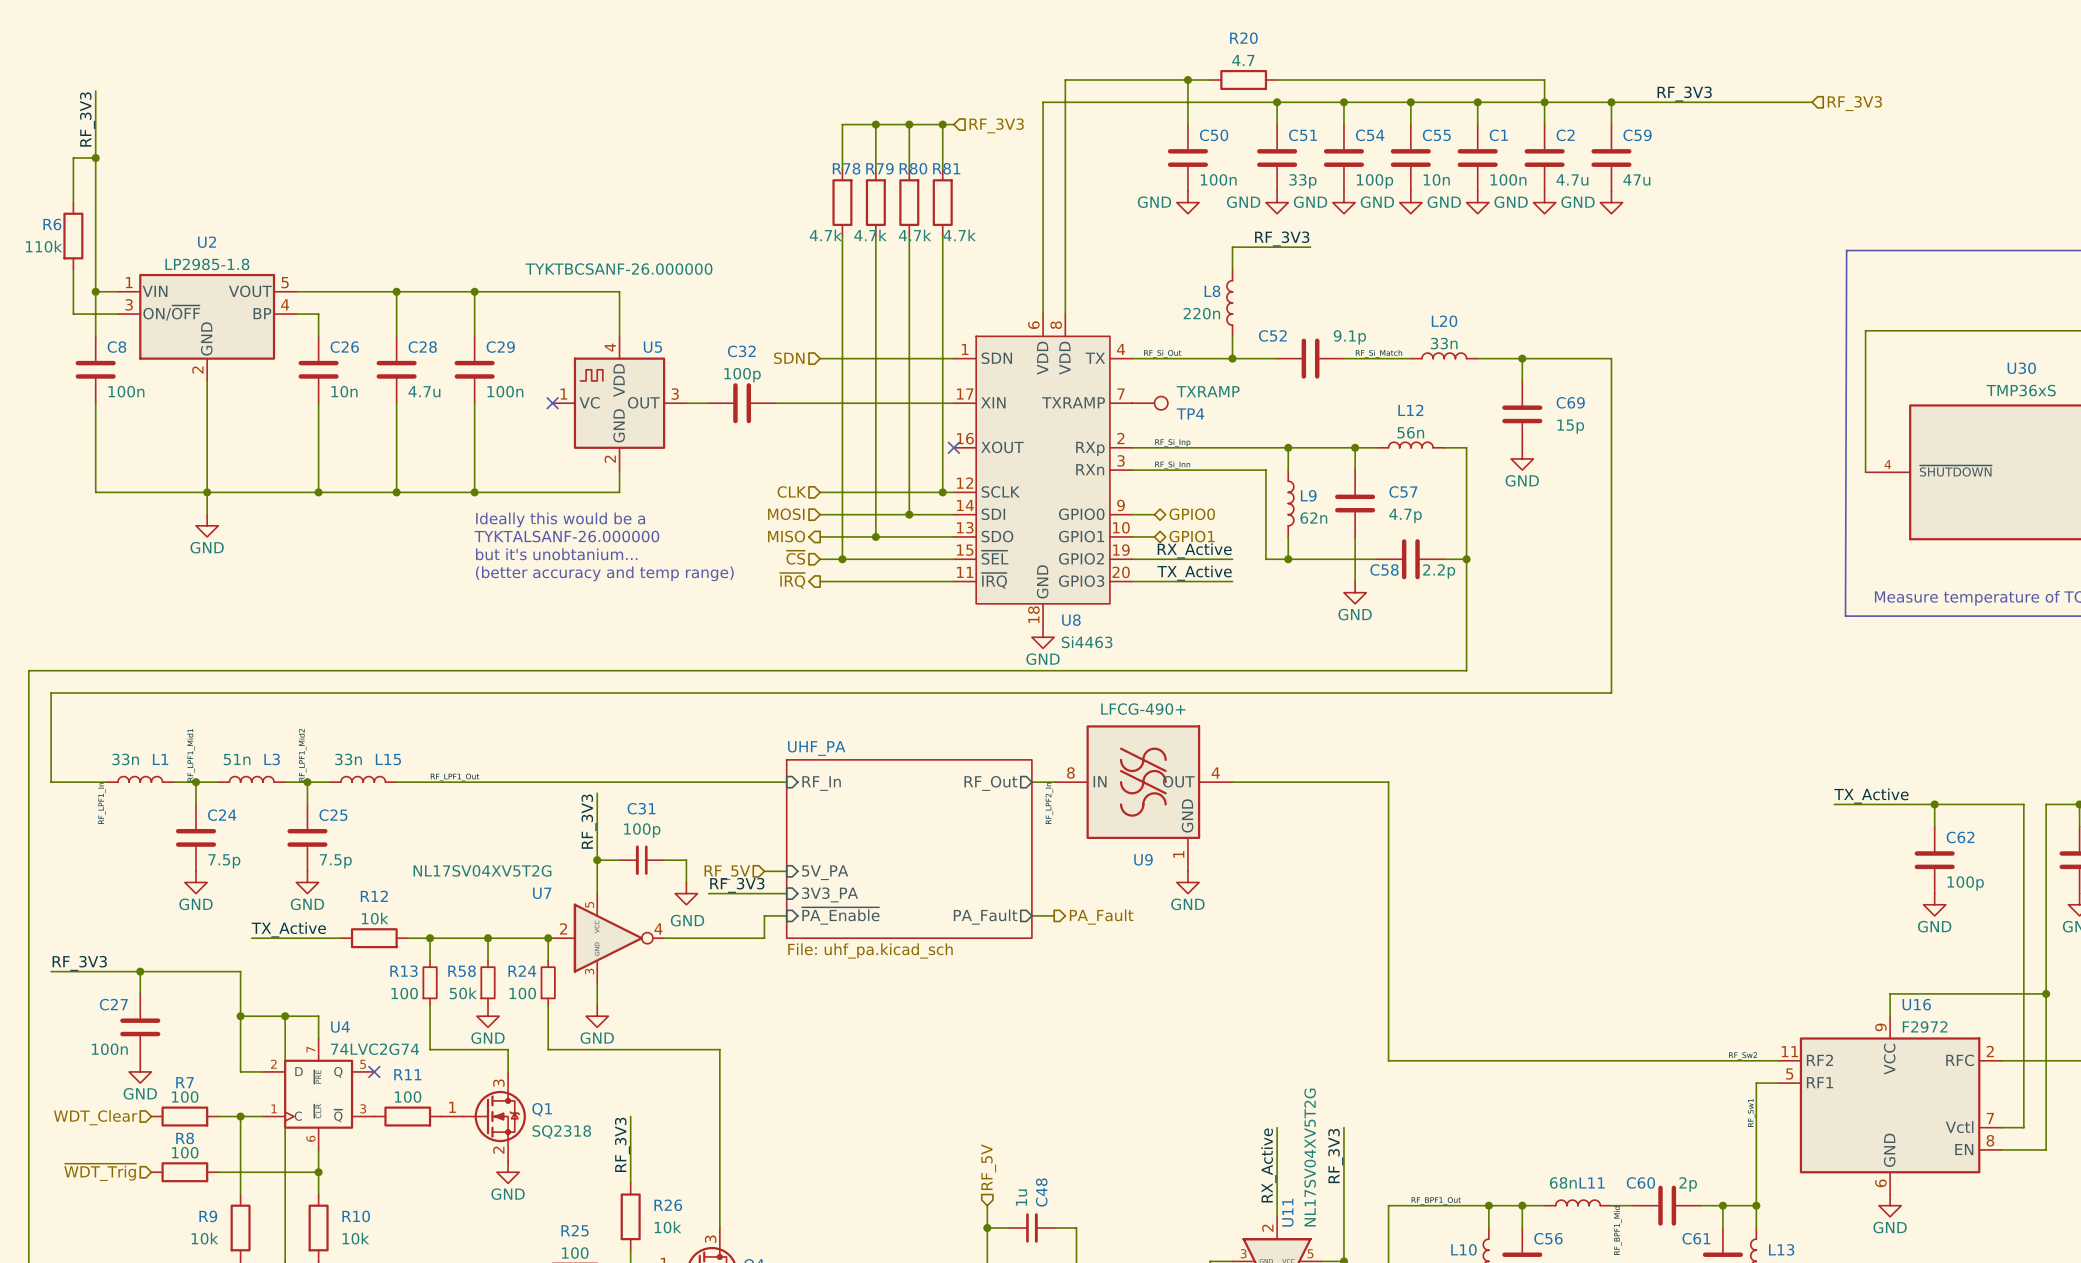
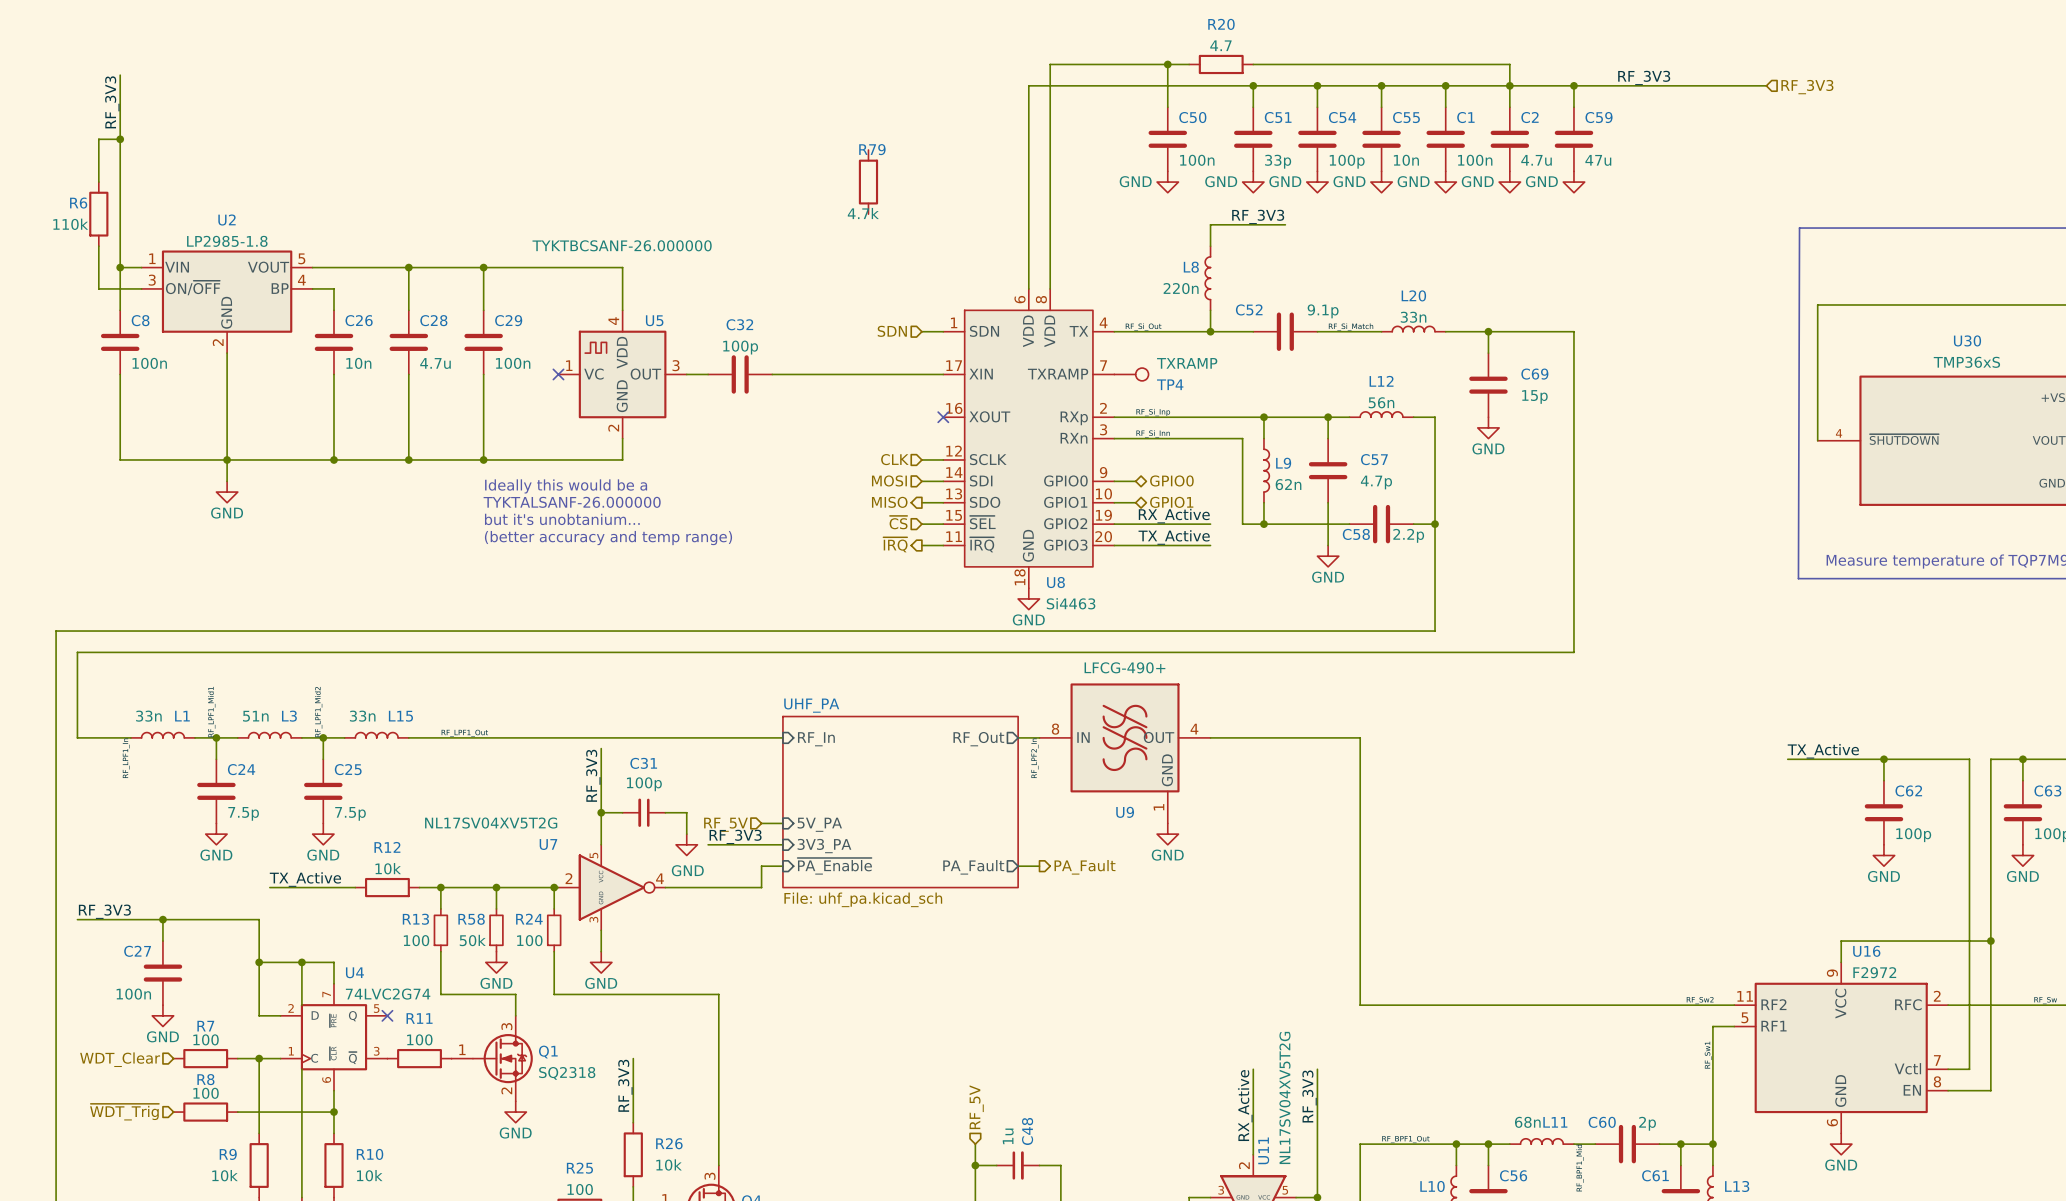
wire: (875, 124) (875, 169) -> none
junction: (875, 124) -> none
wire: (909, 124) (909, 169) -> none
junction: (909, 124) -> none
wire: (942, 124) (942, 169) -> none
junction: (942, 124) -> none
wire: (953, 124) (842, 124) (842, 169) -> none
hierarchical label: RF_3V3 (996, 125) -> none
R78: 4.7k (842, 202) -> none
R80: 4.7k (909, 202) -> none
R81: 4.7k (942, 202) -> none
wire: (842, 236) (842, 559) -> none
wire: (875, 236) (875, 536) -> none
wire: (909, 236) (909, 514) -> none
wire: (942, 236) (942, 492) -> none
hierarchical label position: SDN (789, 358) -> SDN (892, 331)
wire: (820, 358) (931, 358) -> none
hierarchical label position: CLK (791, 491) -> CLK (894, 459)
wire: (820, 492) (931, 492) -> none
junction: (942, 492) -> none
hierarchical label position: MOSI (786, 514) -> MOSI (889, 480)
wire: (820, 514) (931, 514) -> none
junction: (909, 514) -> none
hierarchical label position: MISO (786, 536) -> MISO (889, 502)
wire: (820, 536) (931, 536) -> none
junction: (875, 536) -> none
hierarchical label position: ~{CS} (795, 557) -> ~{CS} (898, 522)
wire: (820, 559) (931, 559) -> none
junction: (842, 559) -> none
hierarchical label position: ~{IRQ} (792, 580) -> ~{IRQ} (895, 544)
wire: (820, 581) (931, 581) -> none

